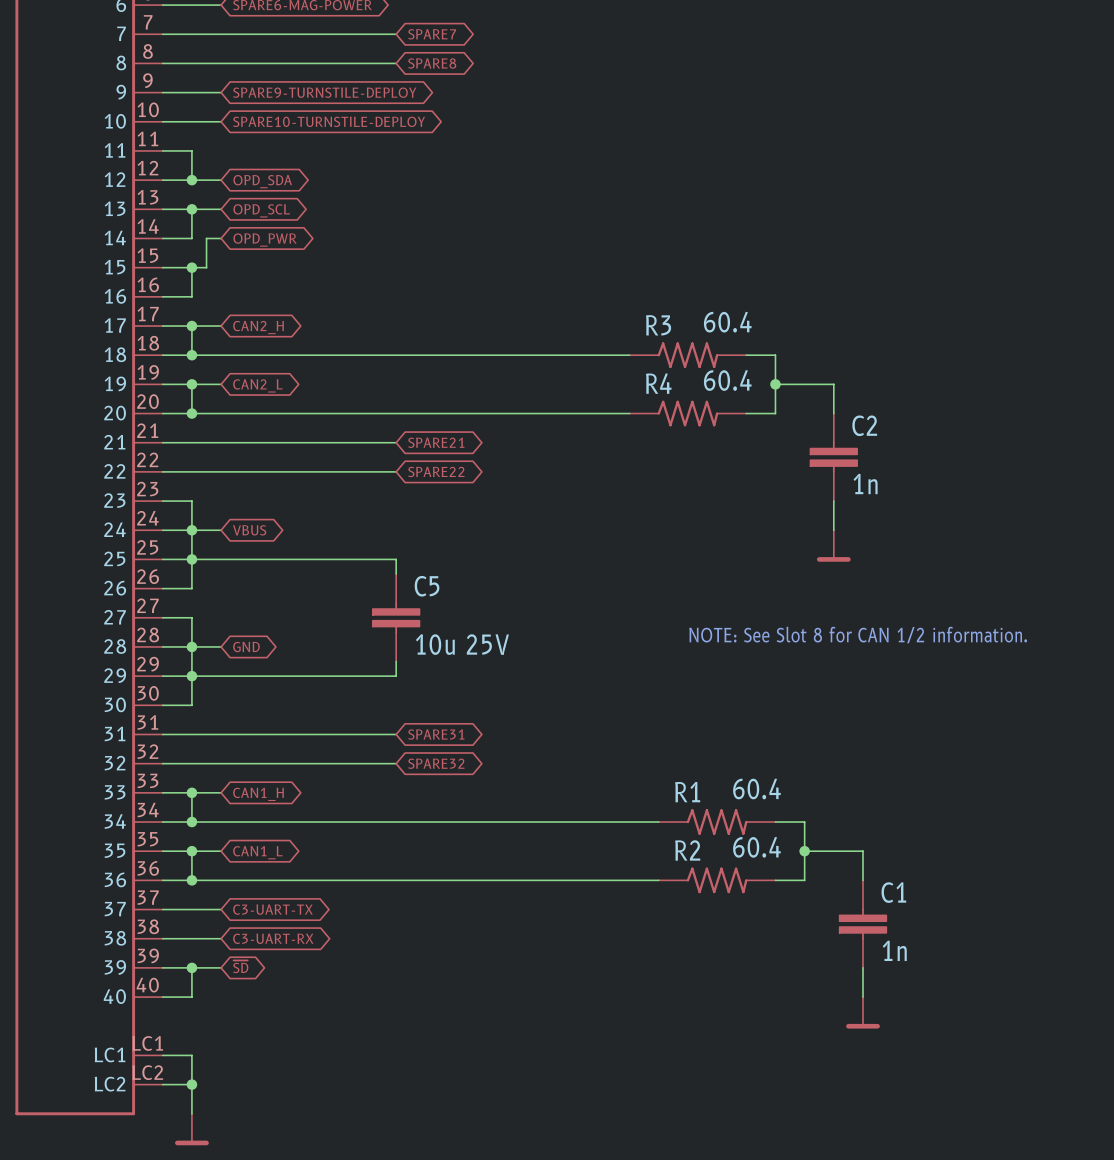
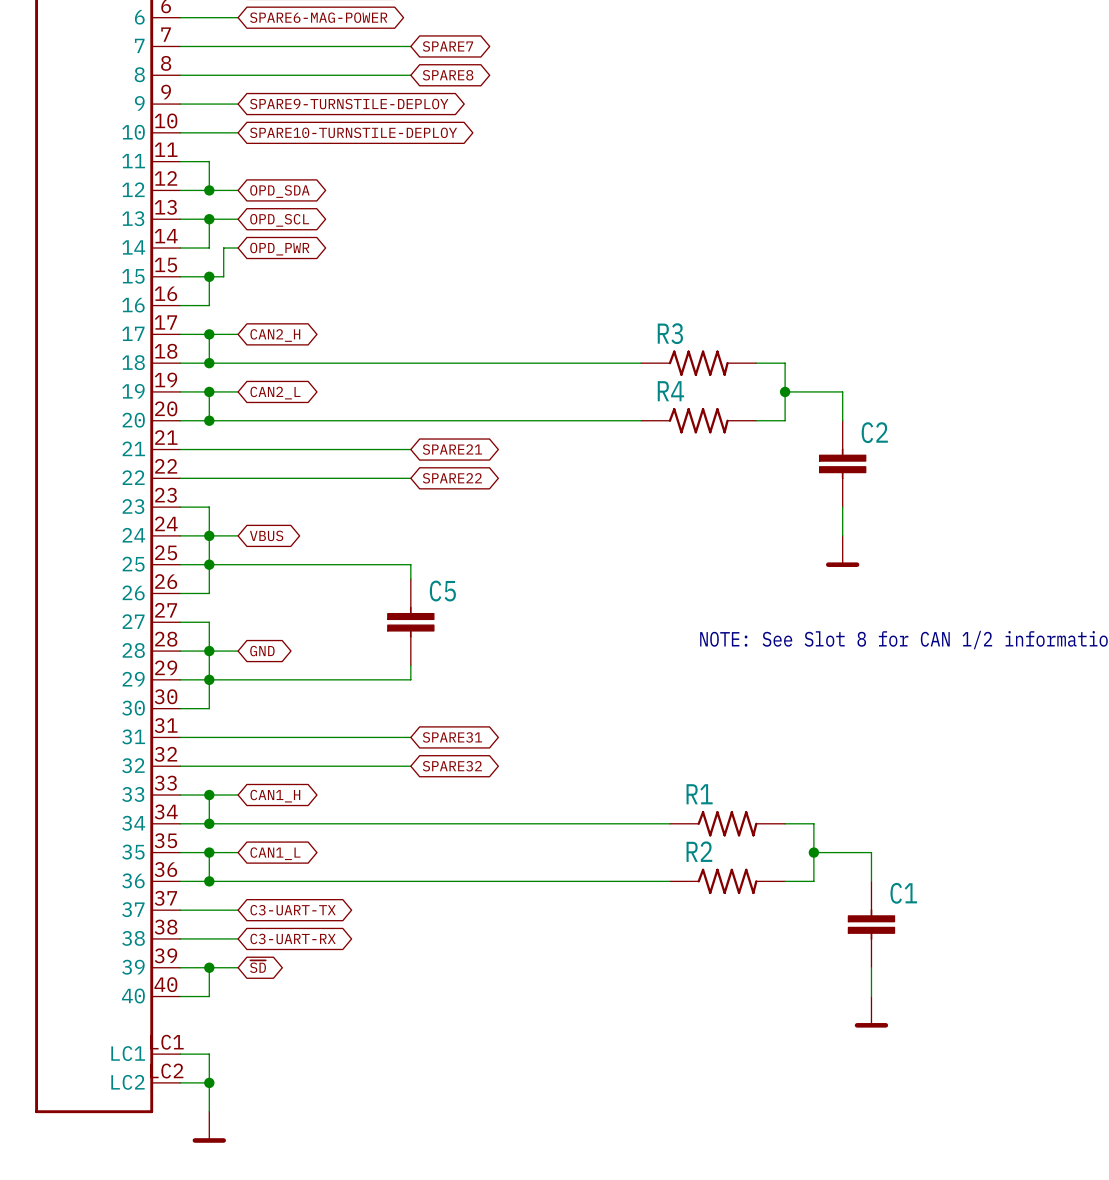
R3 value: 60.4 (727, 322) -> none
R4 value: 60.4 (727, 380) -> none
C2 value: 1n (865, 483) -> none
C5 value: 10u 25V (462, 644) -> none
R1 value: 60.4 (756, 788) -> none
R2 value: 60.4 (756, 847) -> none
C1 value: 1n (894, 950) -> none

